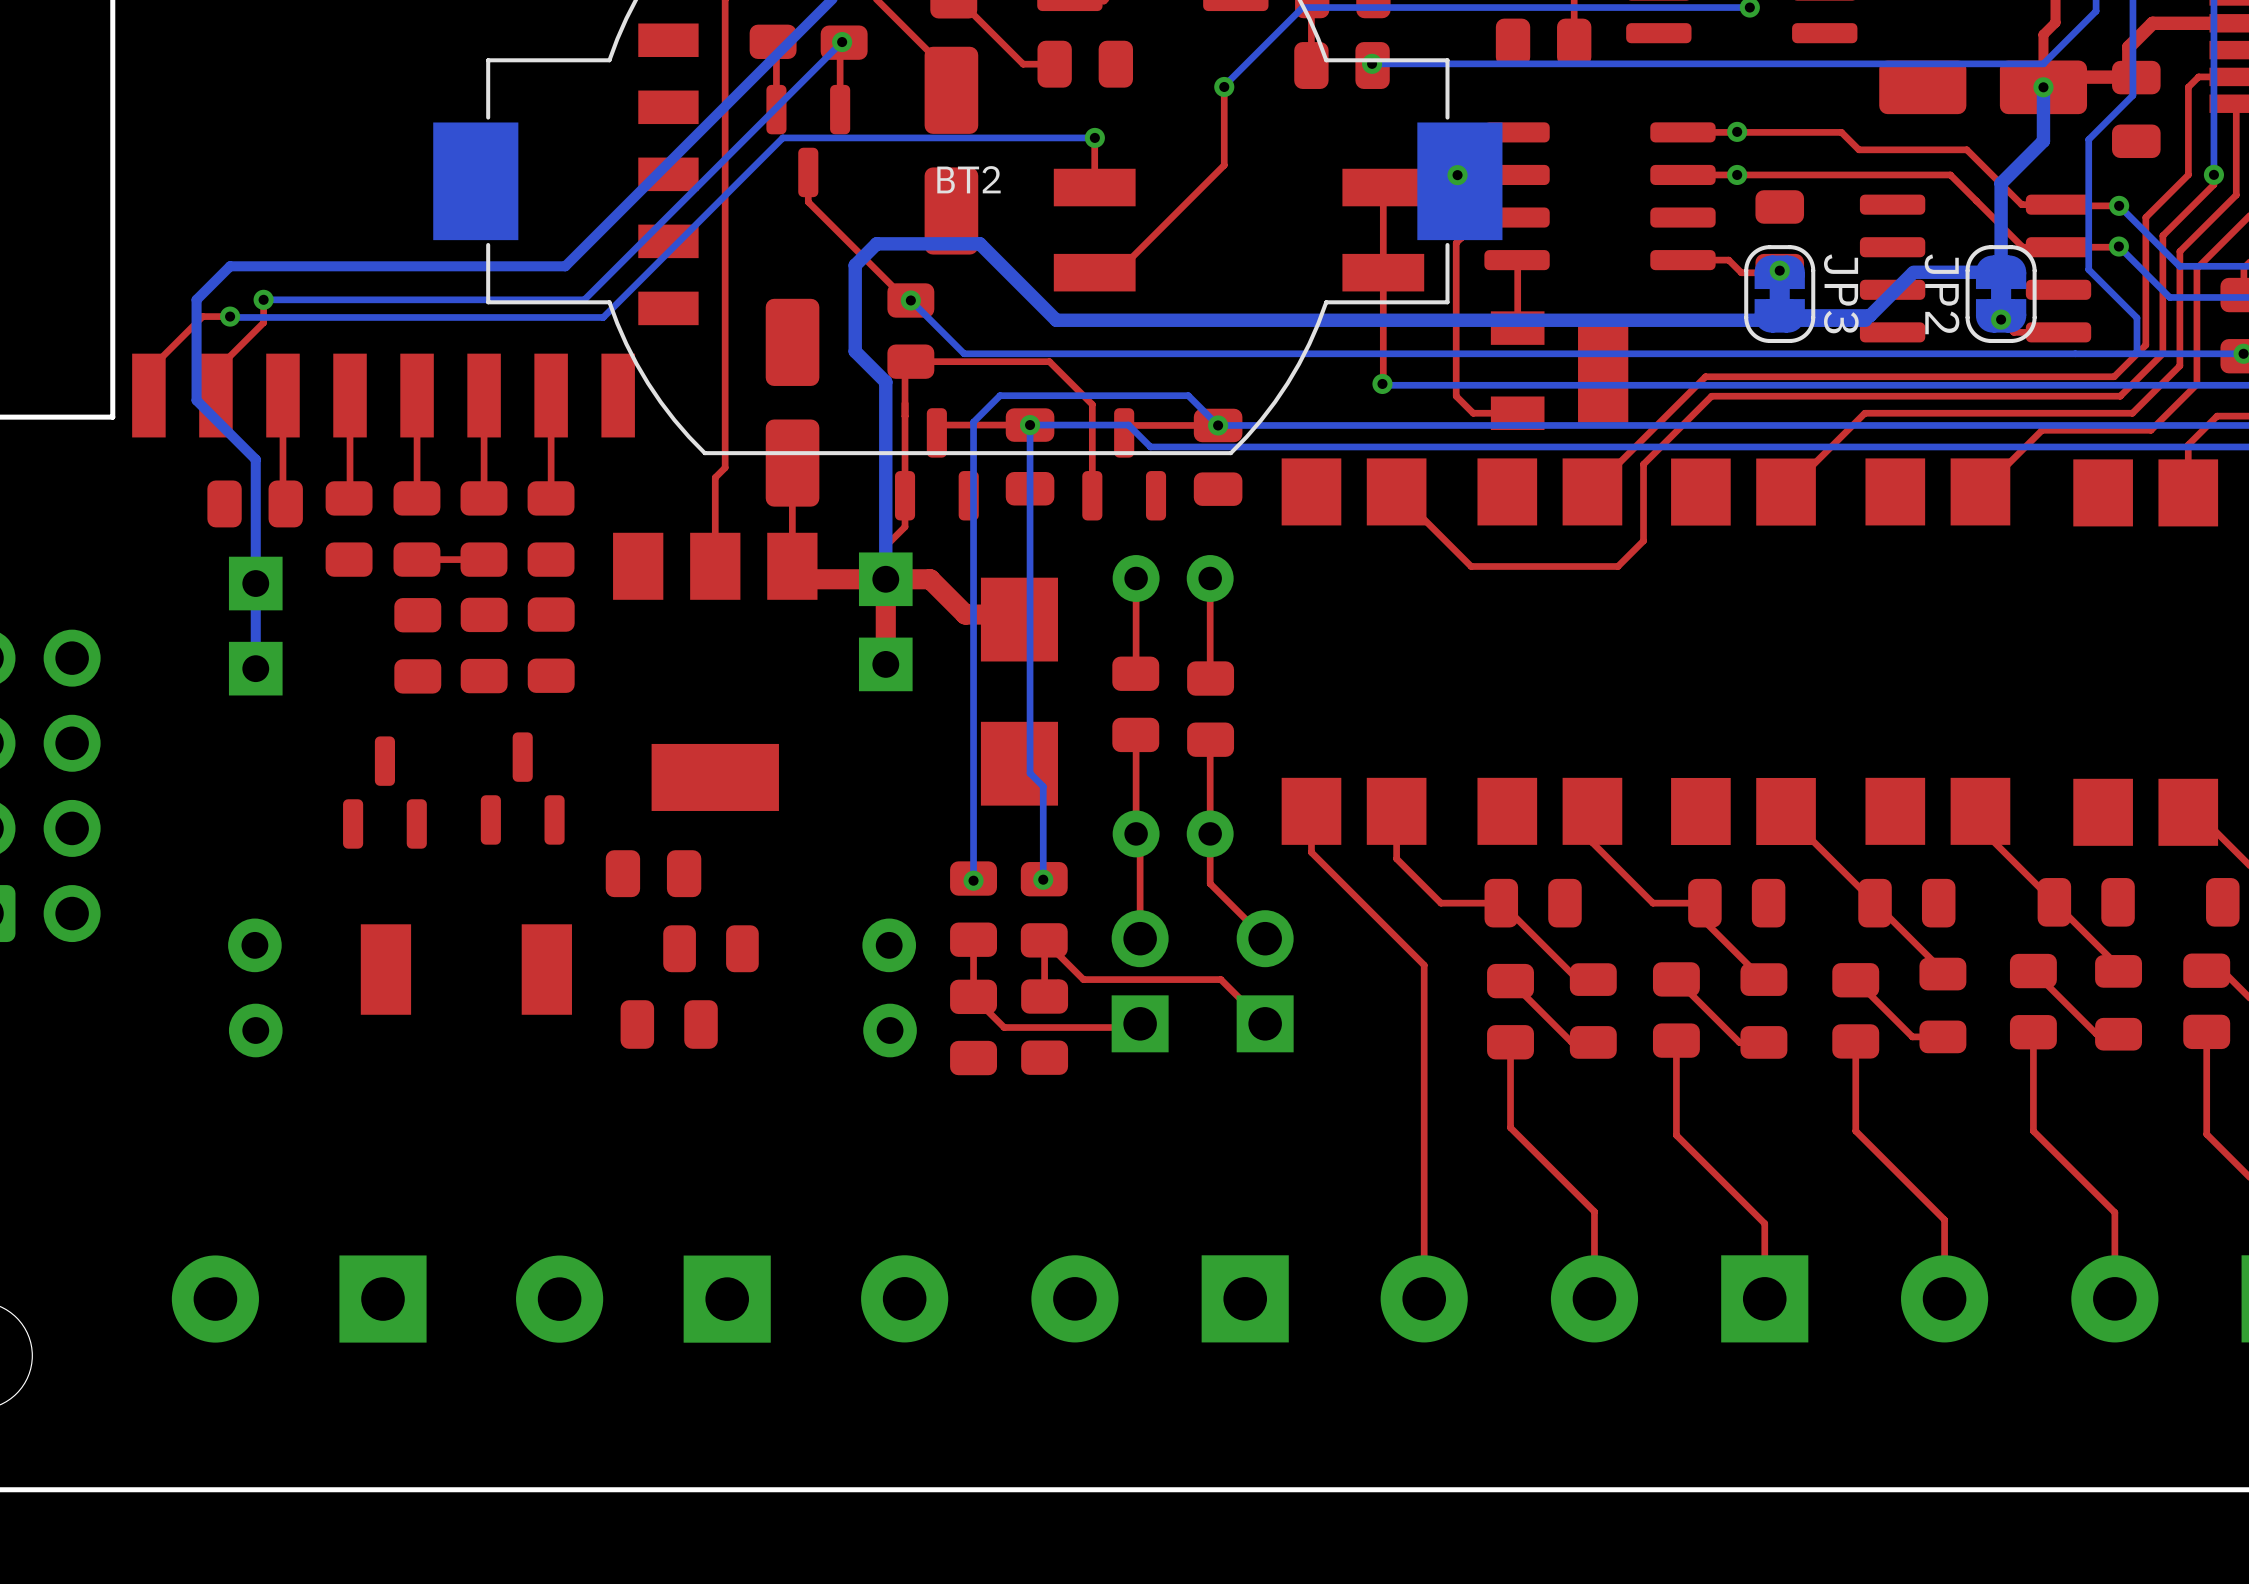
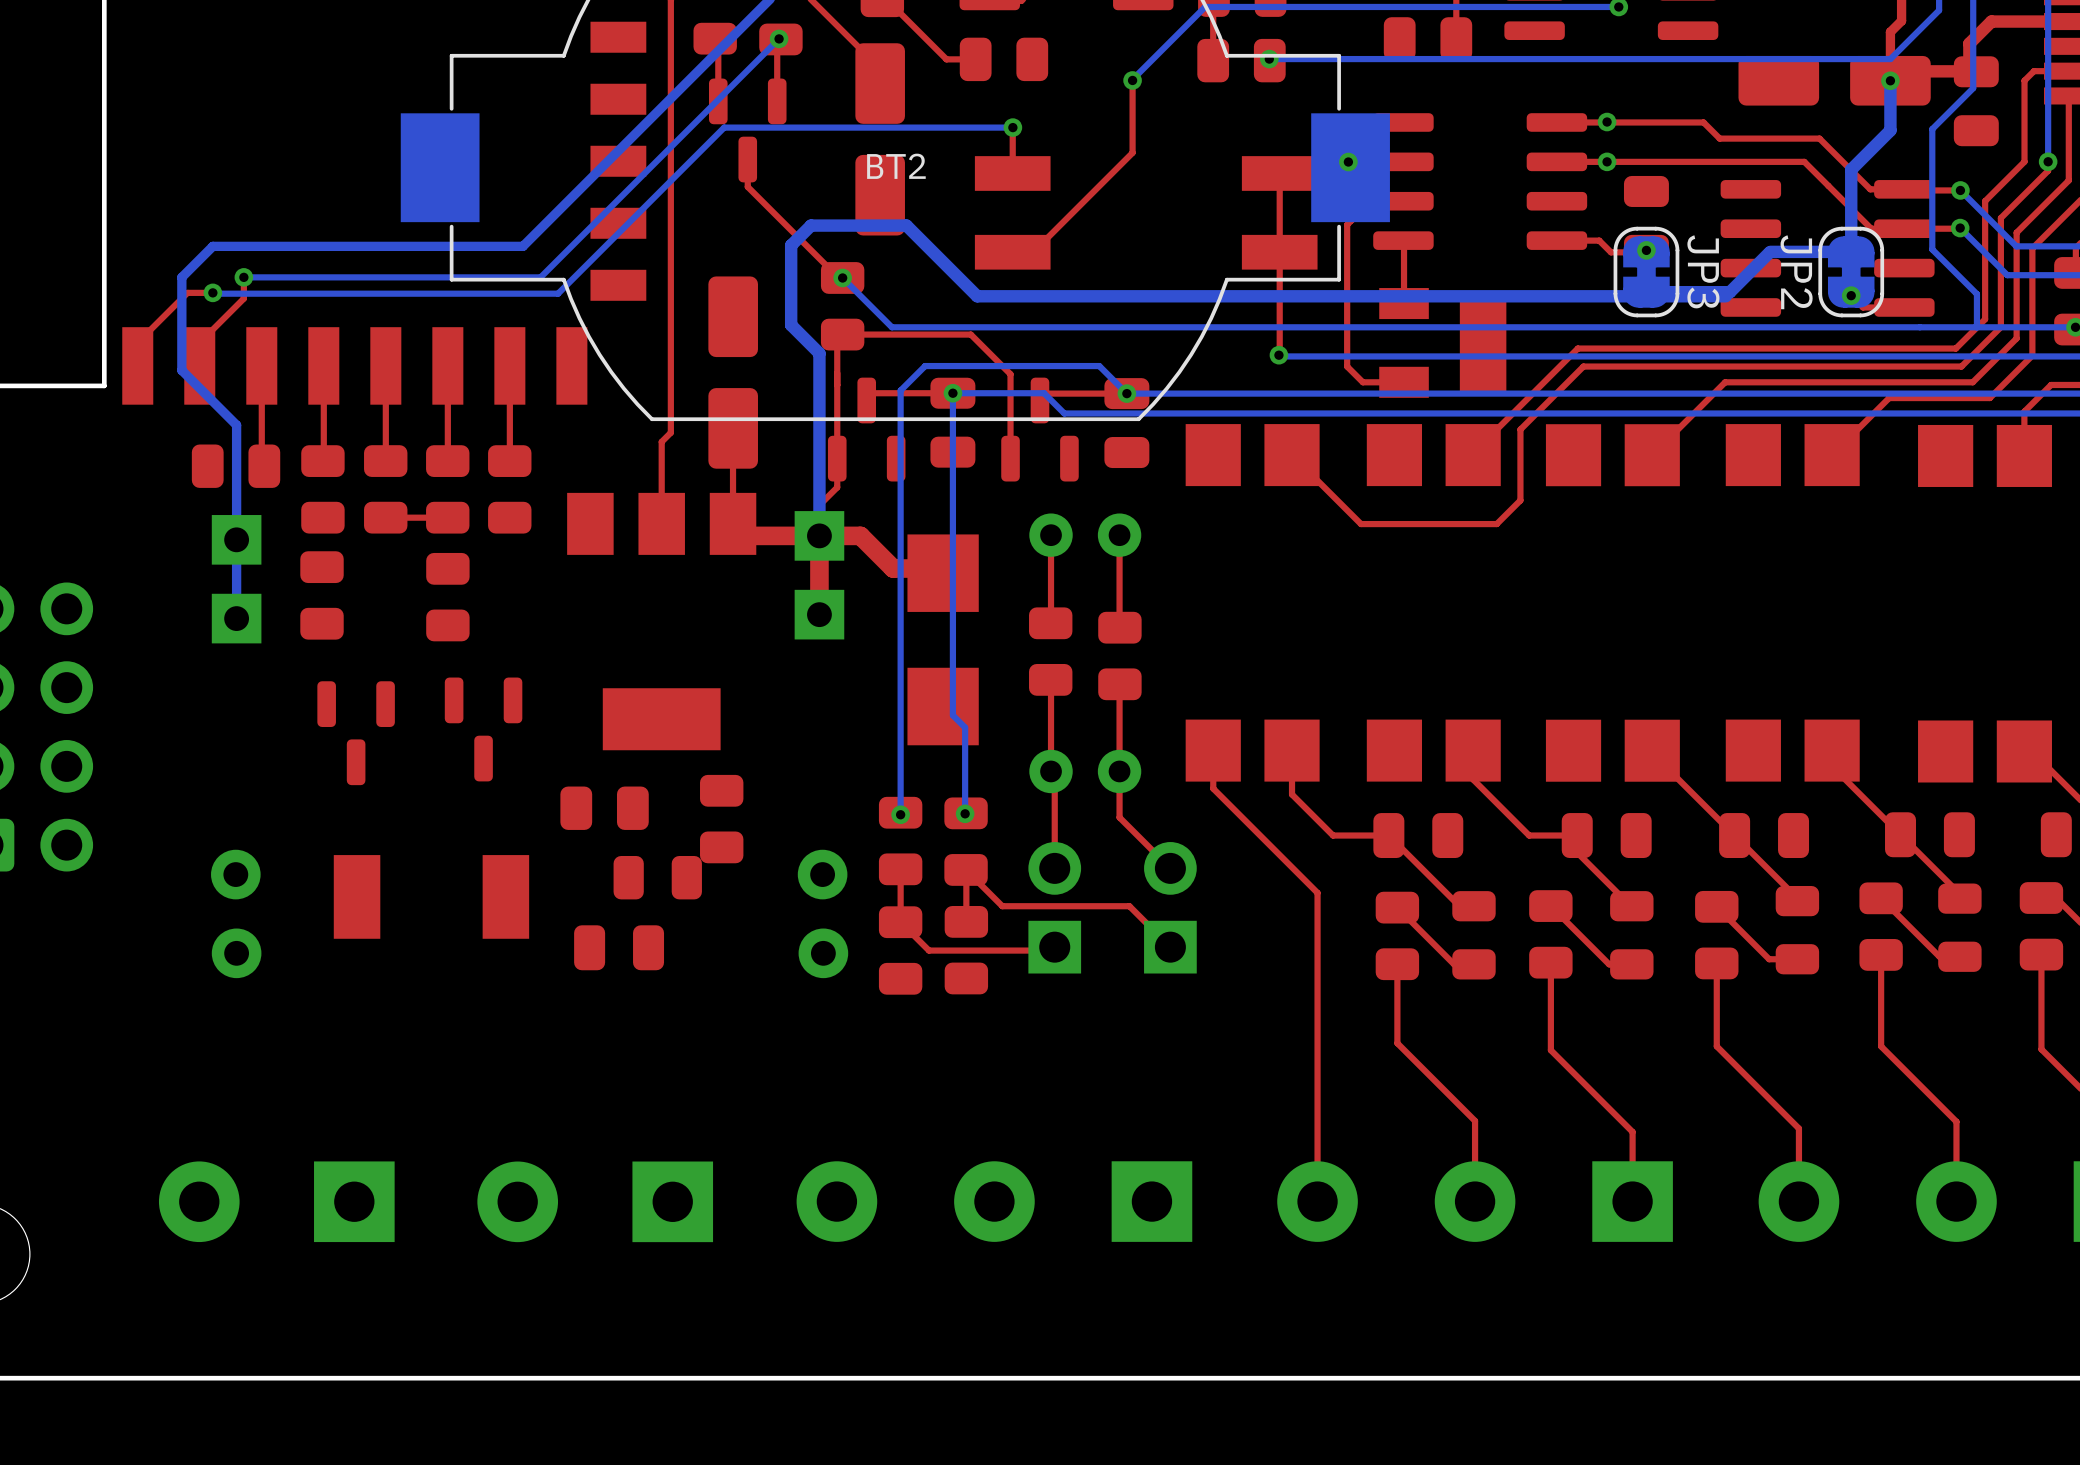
part position: (417, 645) -> (322, 595)
part: (551, 645) -> none
part rotation: 0° (522, 788) -> 180° (483, 729)
part rotation: 0° (384, 792) -> 180° (356, 733)
part: none -> (721, 819)

